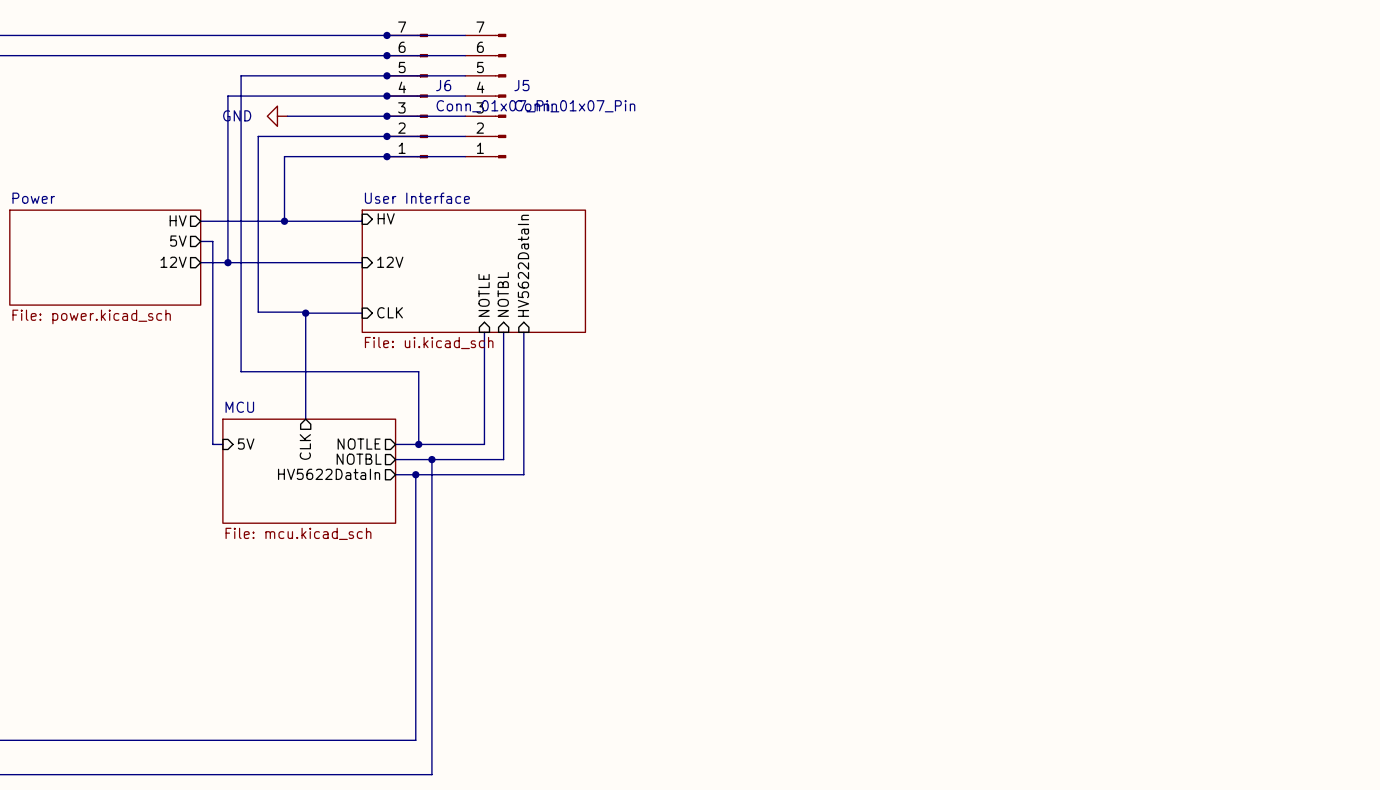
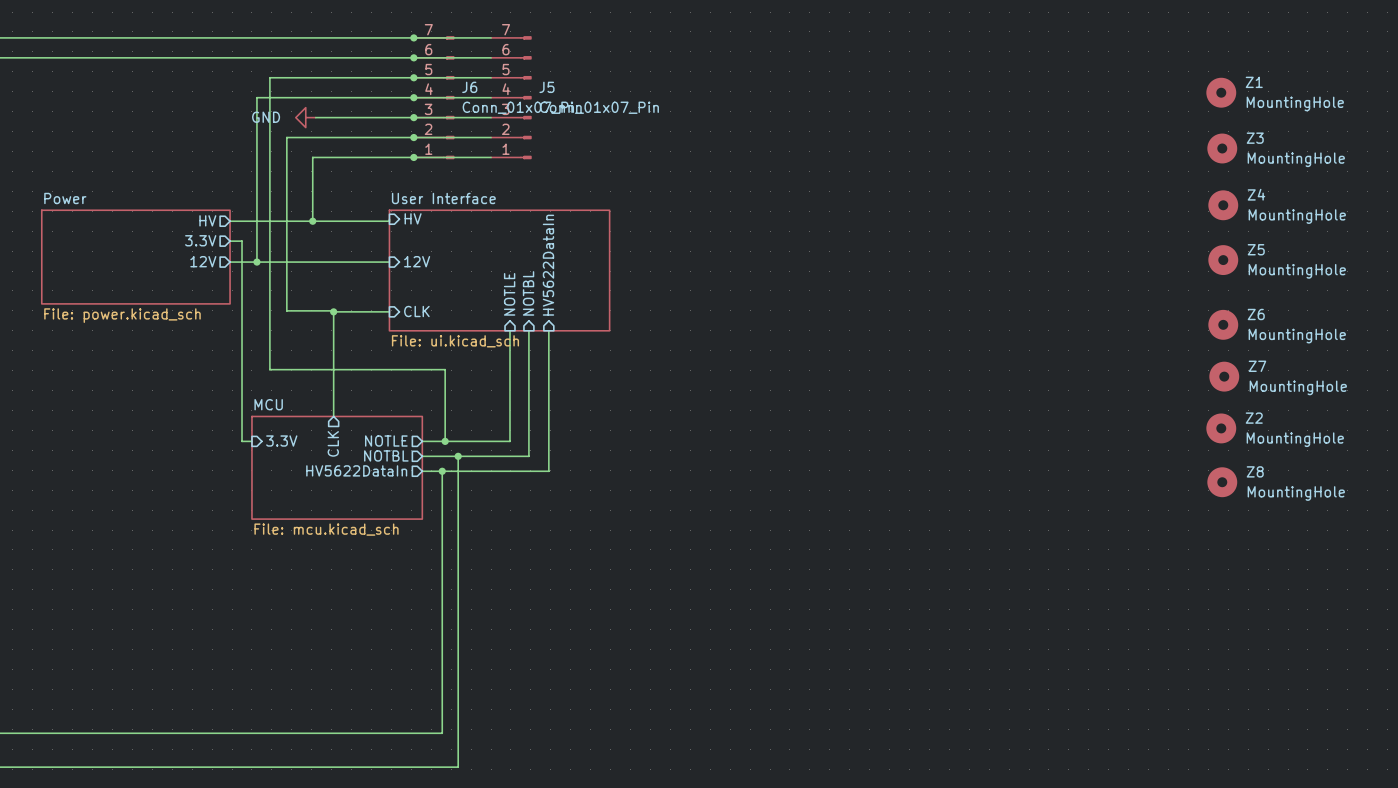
Z1: none -> MountingHole (1221, 92)
Z3: none -> MountingHole (1222, 148)
Z4: none -> MountingHole (1223, 205)
sheet pin: 5V (178, 241) -> 3.3V (200, 240)
Z5: none -> MountingHole (1223, 260)
Z6: none -> MountingHole (1223, 324)
Z7: none -> MountingHole (1224, 376)
Z2: none -> MountingHole (1221, 428)
sheet pin: 5V (246, 444) -> 3.3V (281, 441)
Z8: none -> MountingHole (1222, 482)

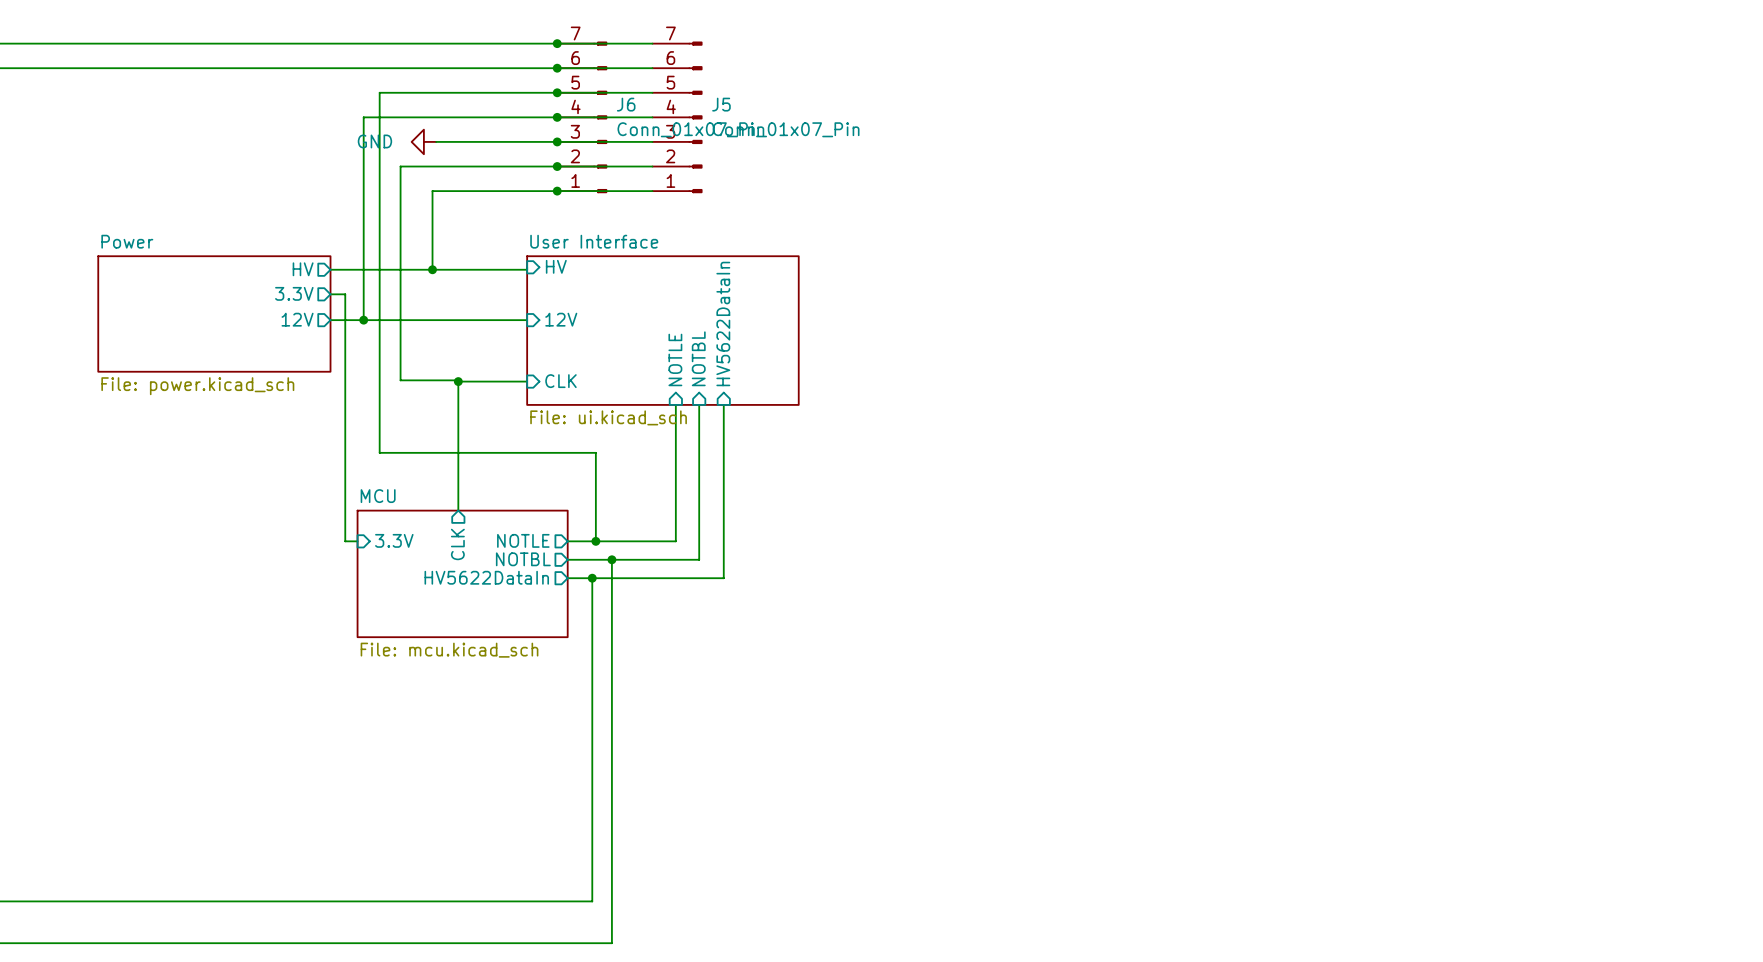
Z1: MountingHole (1221, 92) -> none
Z3: MountingHole (1222, 148) -> none
Z4: MountingHole (1223, 205) -> none
Z5: MountingHole (1223, 260) -> none
Z6: MountingHole (1223, 324) -> none
Z7: MountingHole (1224, 376) -> none
Z2: MountingHole (1221, 428) -> none
Z8: MountingHole (1222, 482) -> none

